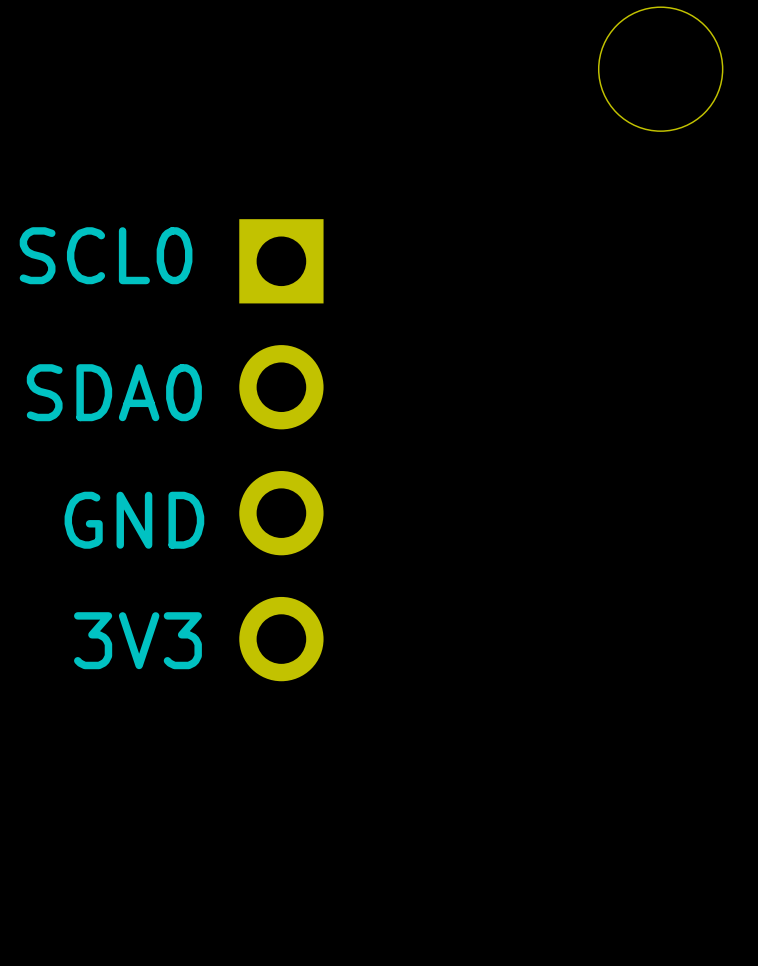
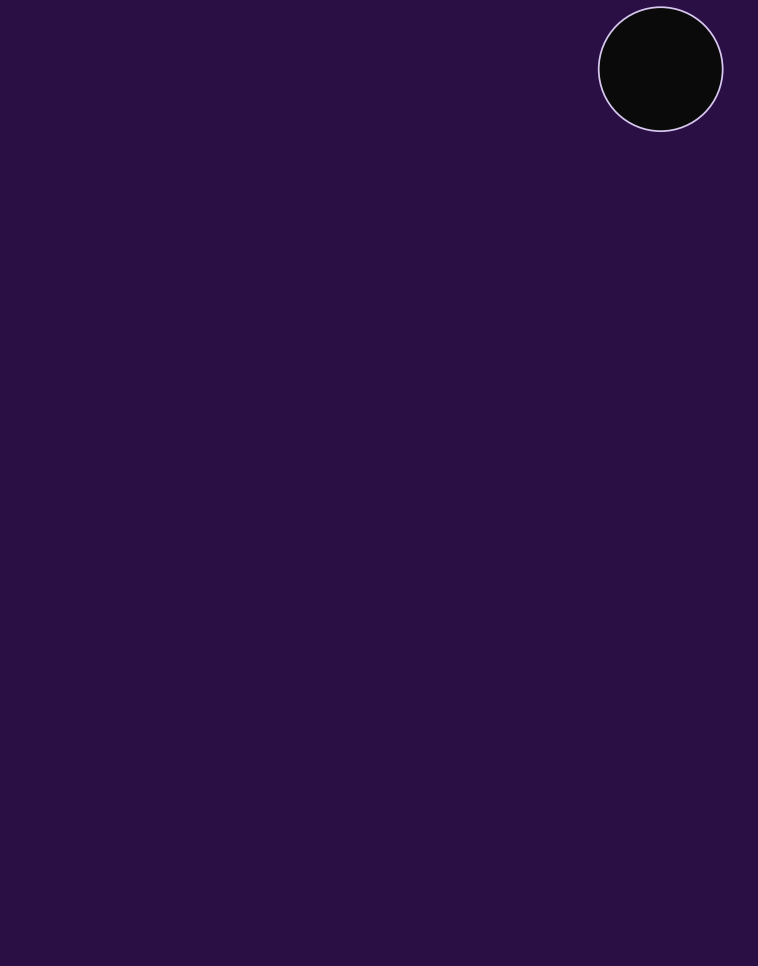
text: SCL0 (106, 255) -> none
text: SDA0 (114, 392) -> none
part: (281, 450) -> none
text: GND (134, 520) -> none
text: 3V3 (137, 640) -> none

